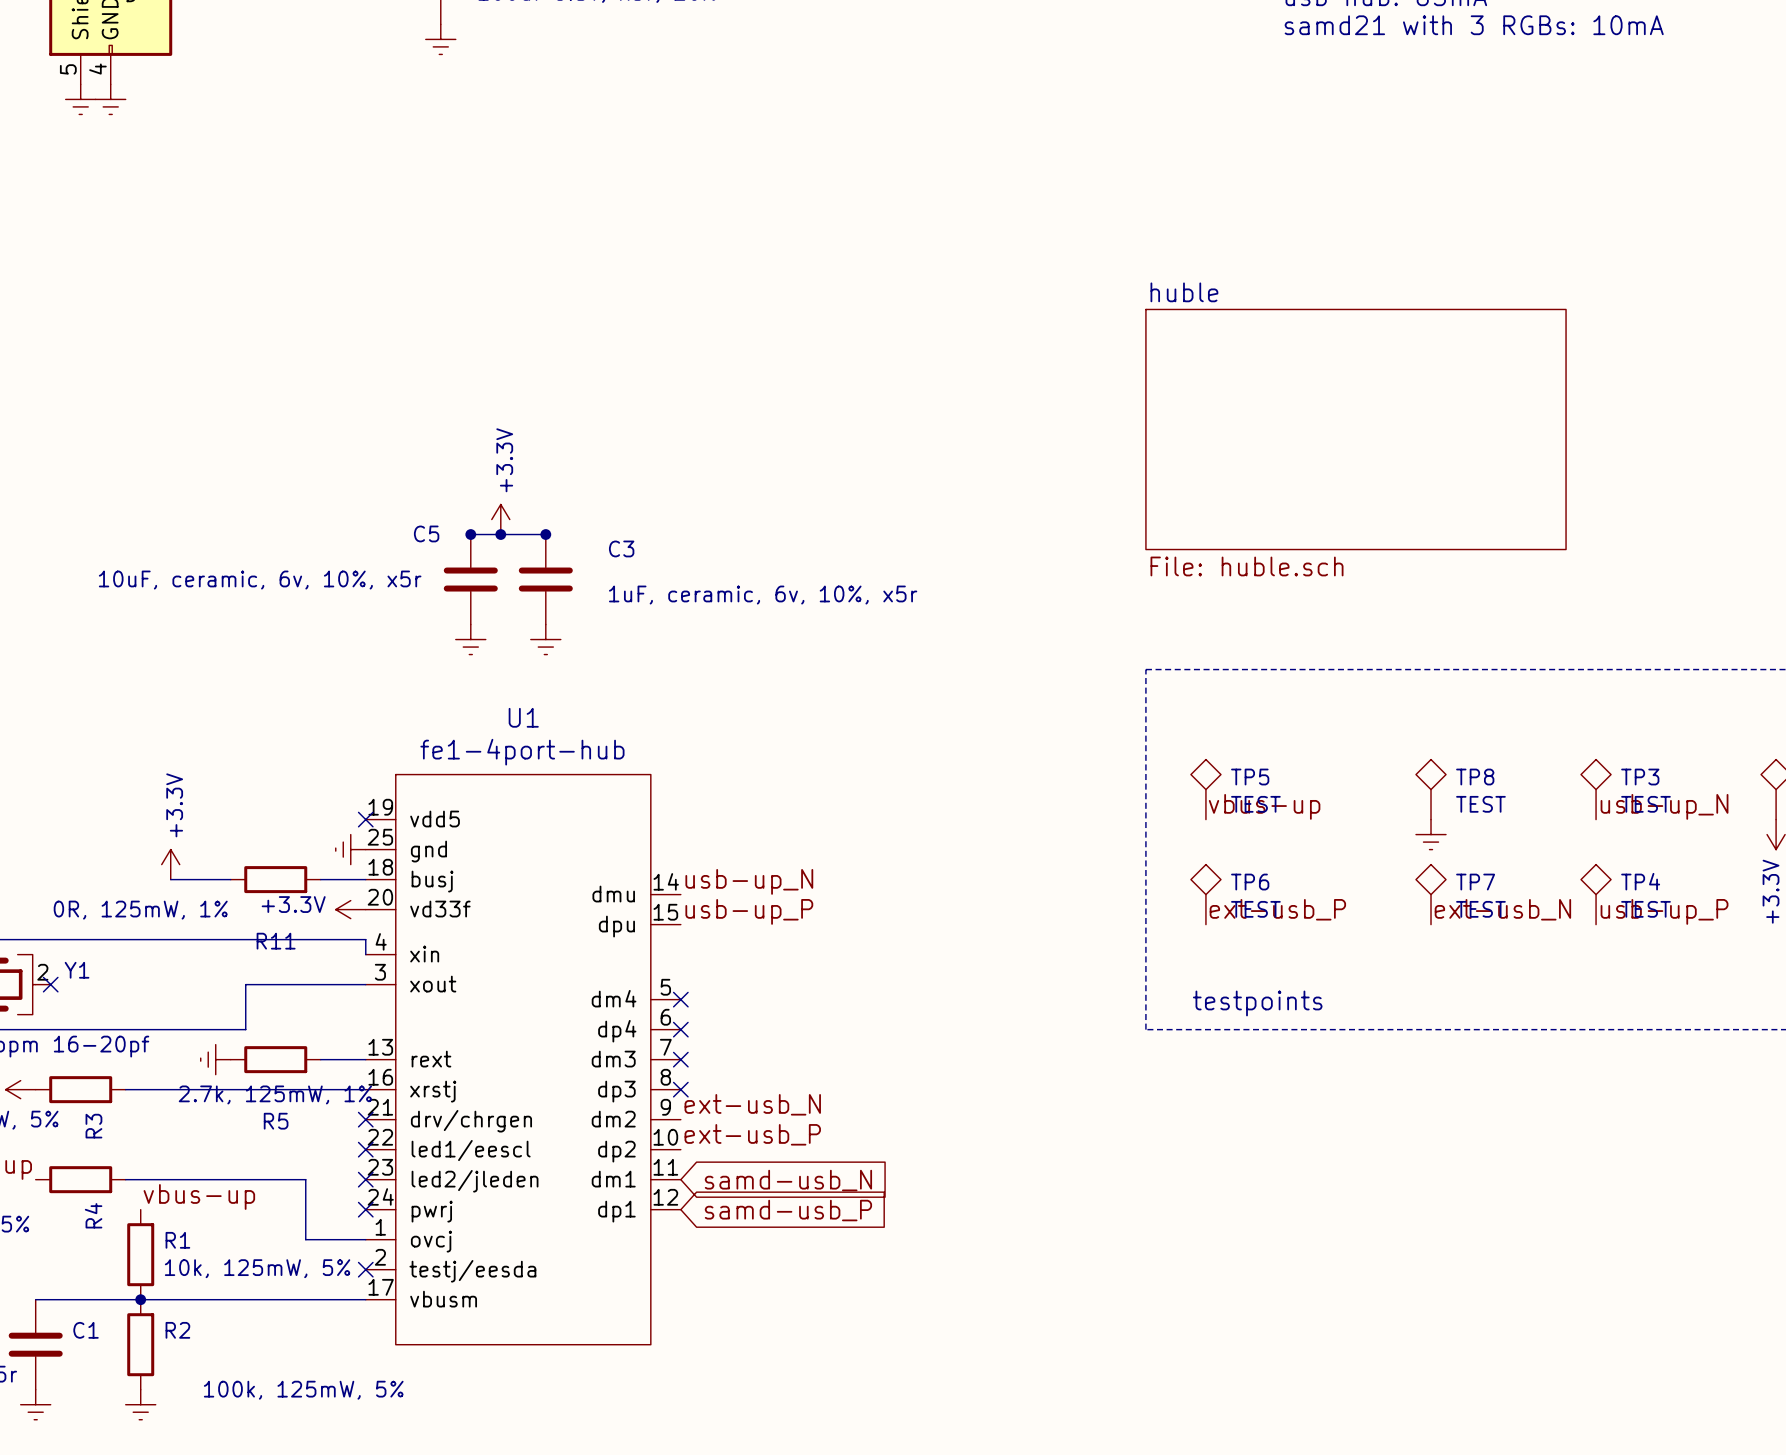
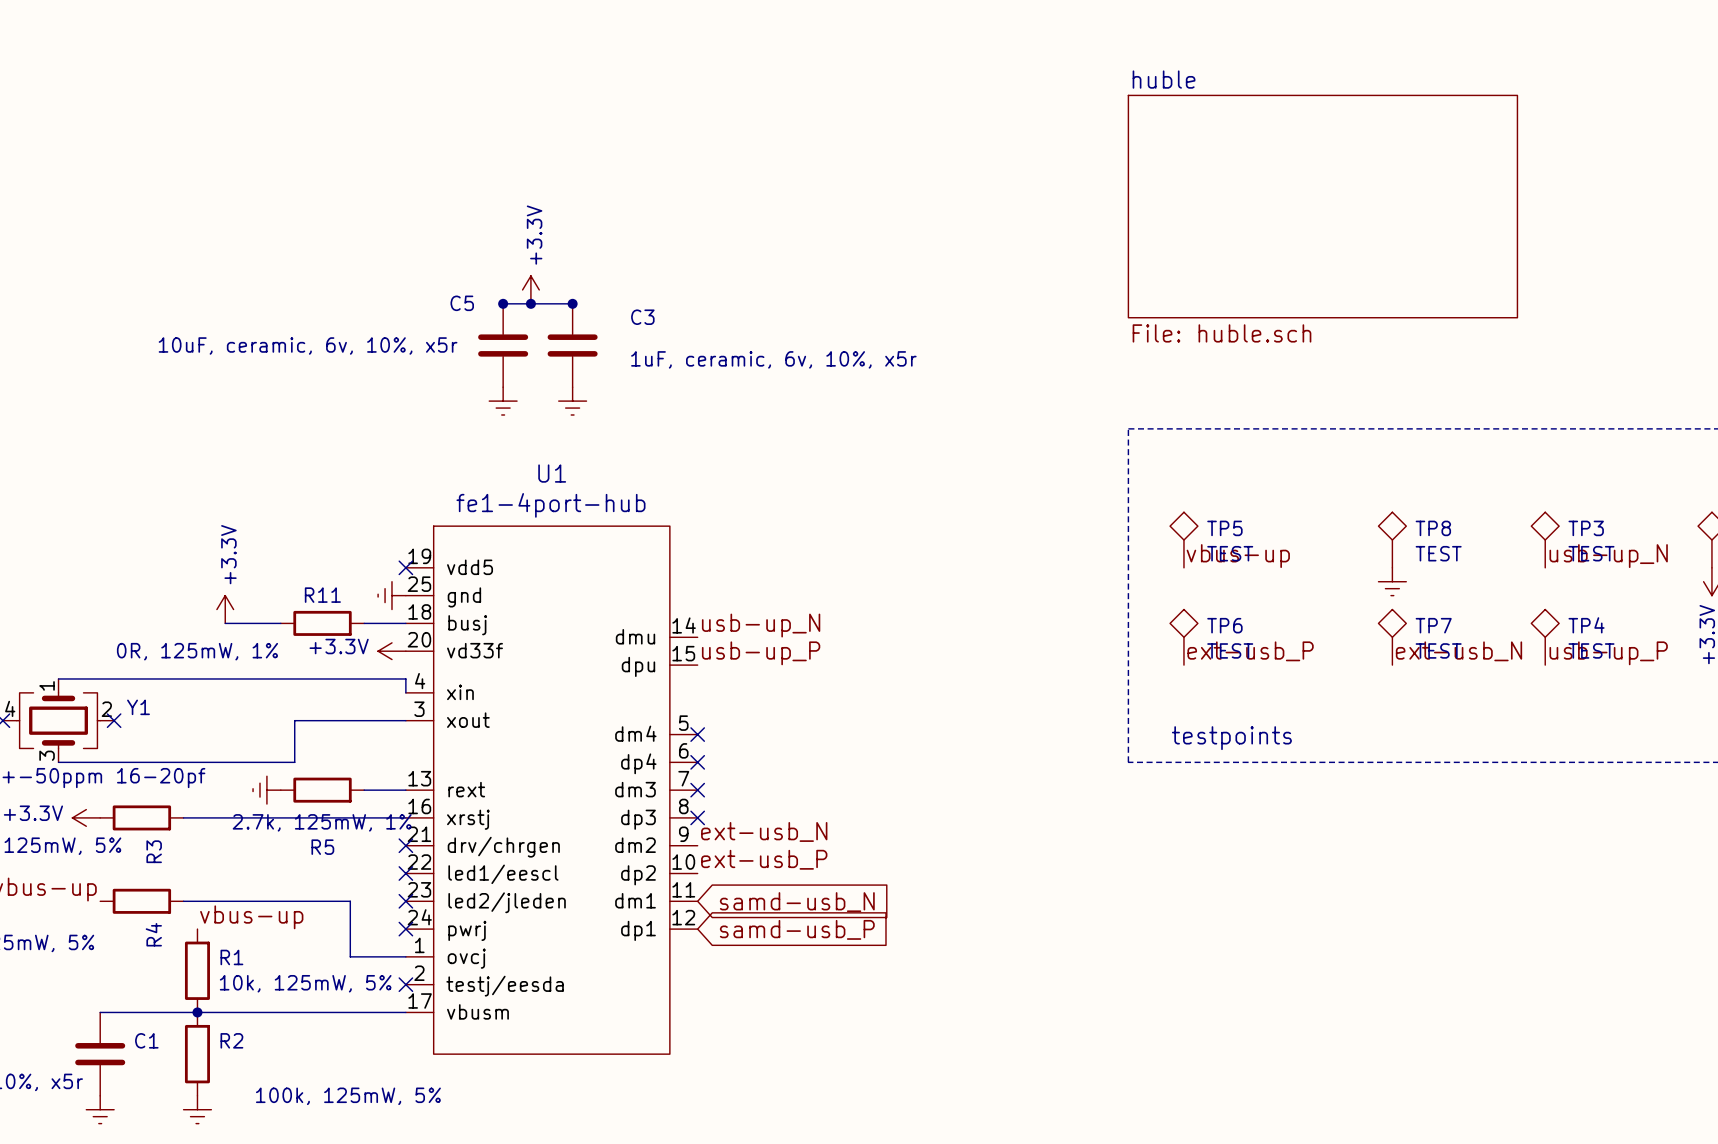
R11 name position: R11 (276, 941) -> R11 (322, 595)

